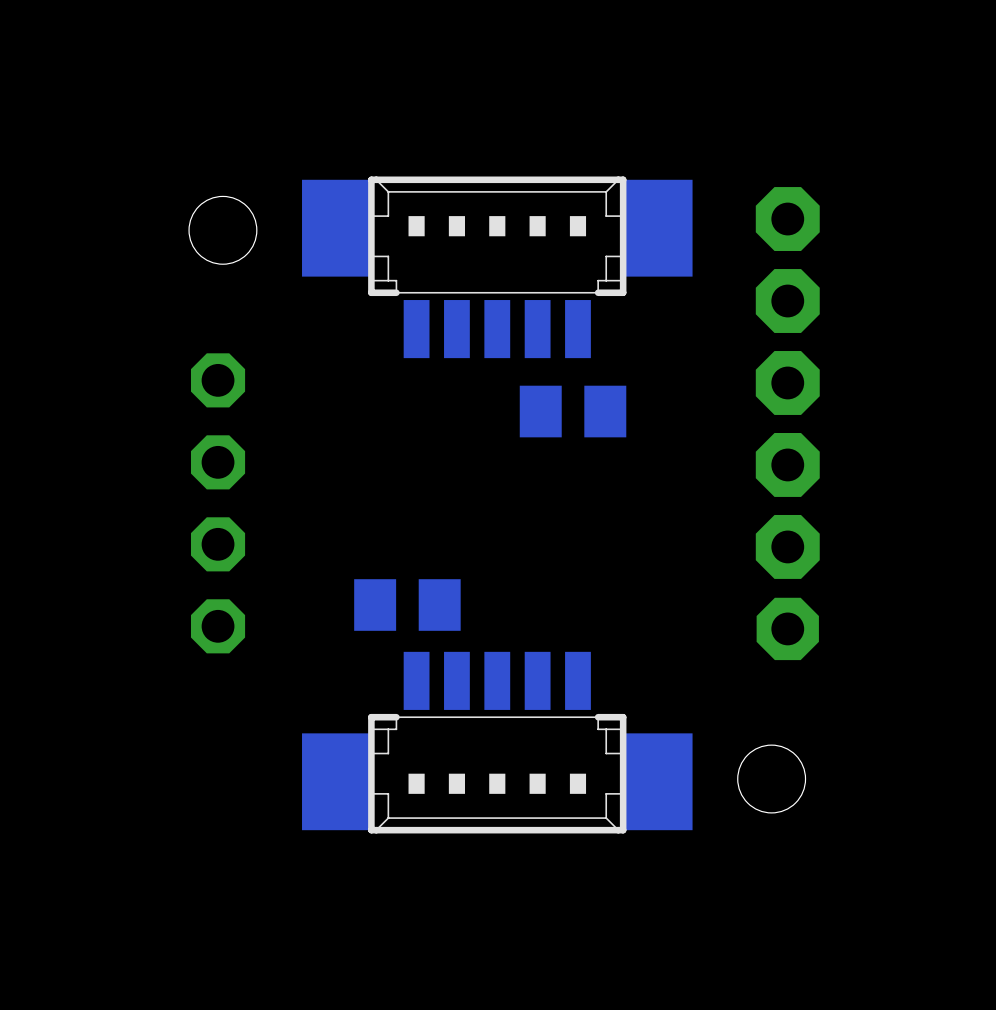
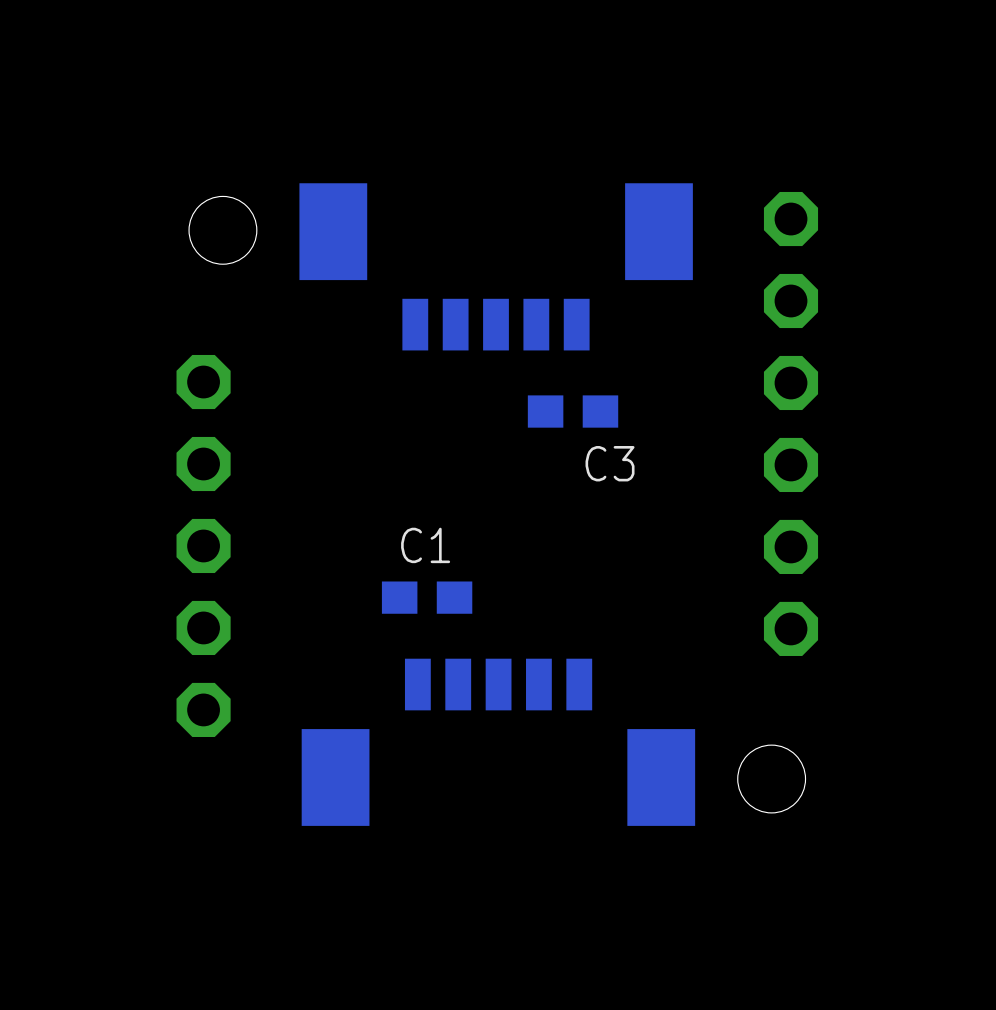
part footprint: [302, 176, 693, 359] -> [299, 183, 693, 351]
part footprint: [755, 187, 820, 661] -> [763, 191, 819, 656]
part: (573, 411) -> none
C3: none -> (573, 411)
part: (218, 503) -> none
part: none -> (203, 545)
C1: none -> (427, 597)
part: (407, 605) -> none
part footprint: [302, 651, 693, 834] -> [301, 658, 696, 826]

